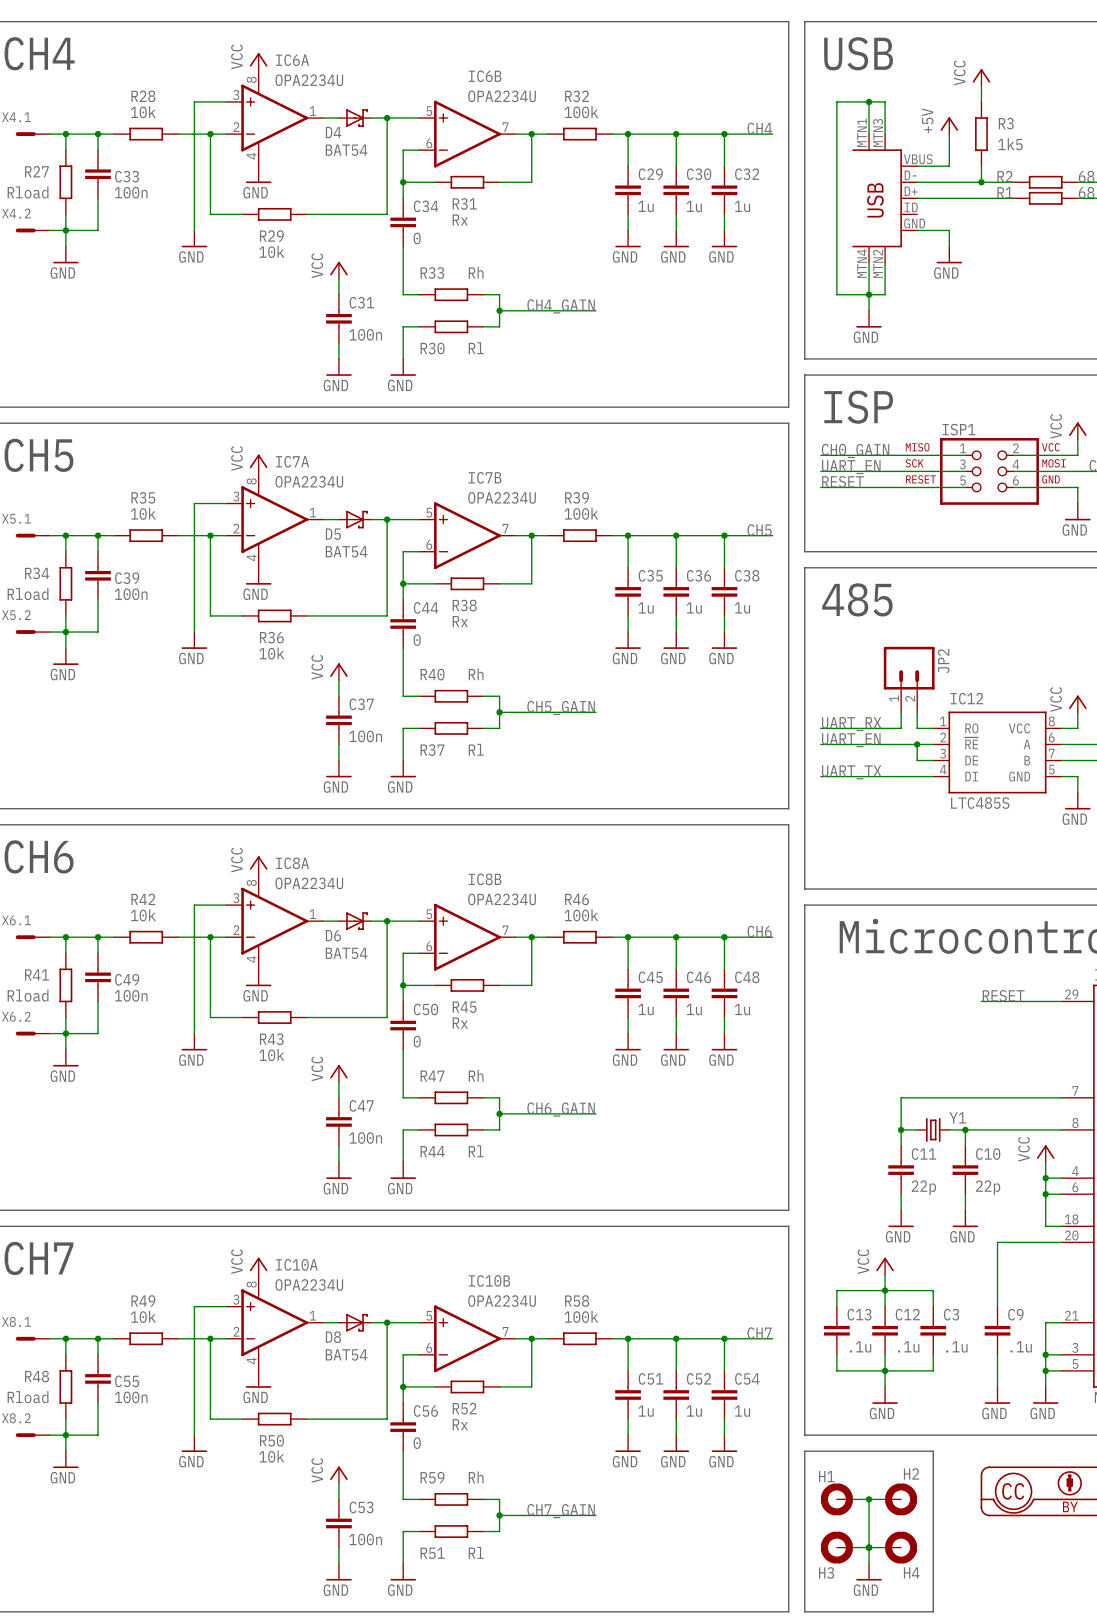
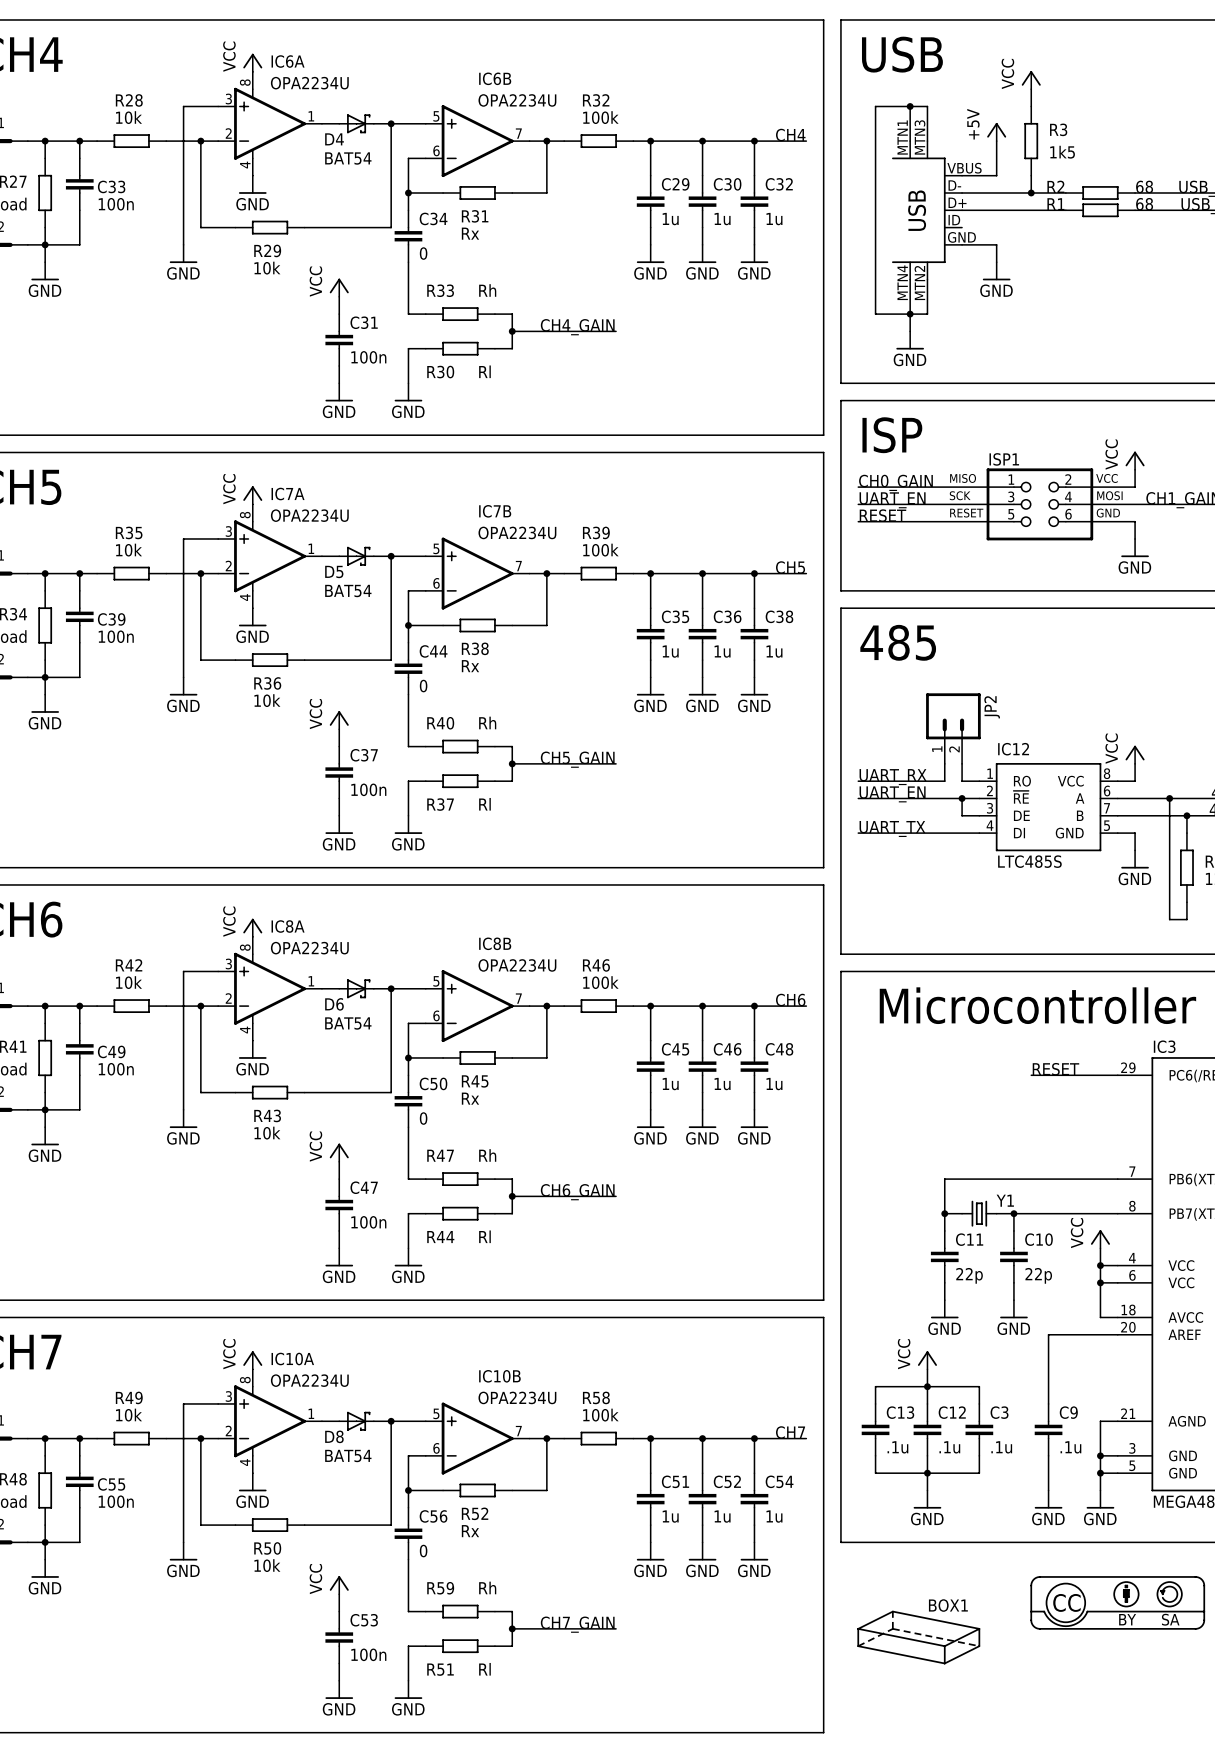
line: (804, 1451) (804, 1611) (933, 1611) (933, 1451) (804, 1451) -> none
H1: (836, 1499) -> none
wire: (852, 1499) (885, 1499) -> none
wire: (869, 1499) (869, 1563) -> none
junction: (869, 1499) -> none
H2: (901, 1499) -> none
BOX1: none -> (918, 1637)
H3: (836, 1547) -> none
wire: (852, 1547) (885, 1547) -> none
junction: (869, 1547) -> none
H4: (901, 1547) -> none
power symbol: GND (869, 1572) -> none

